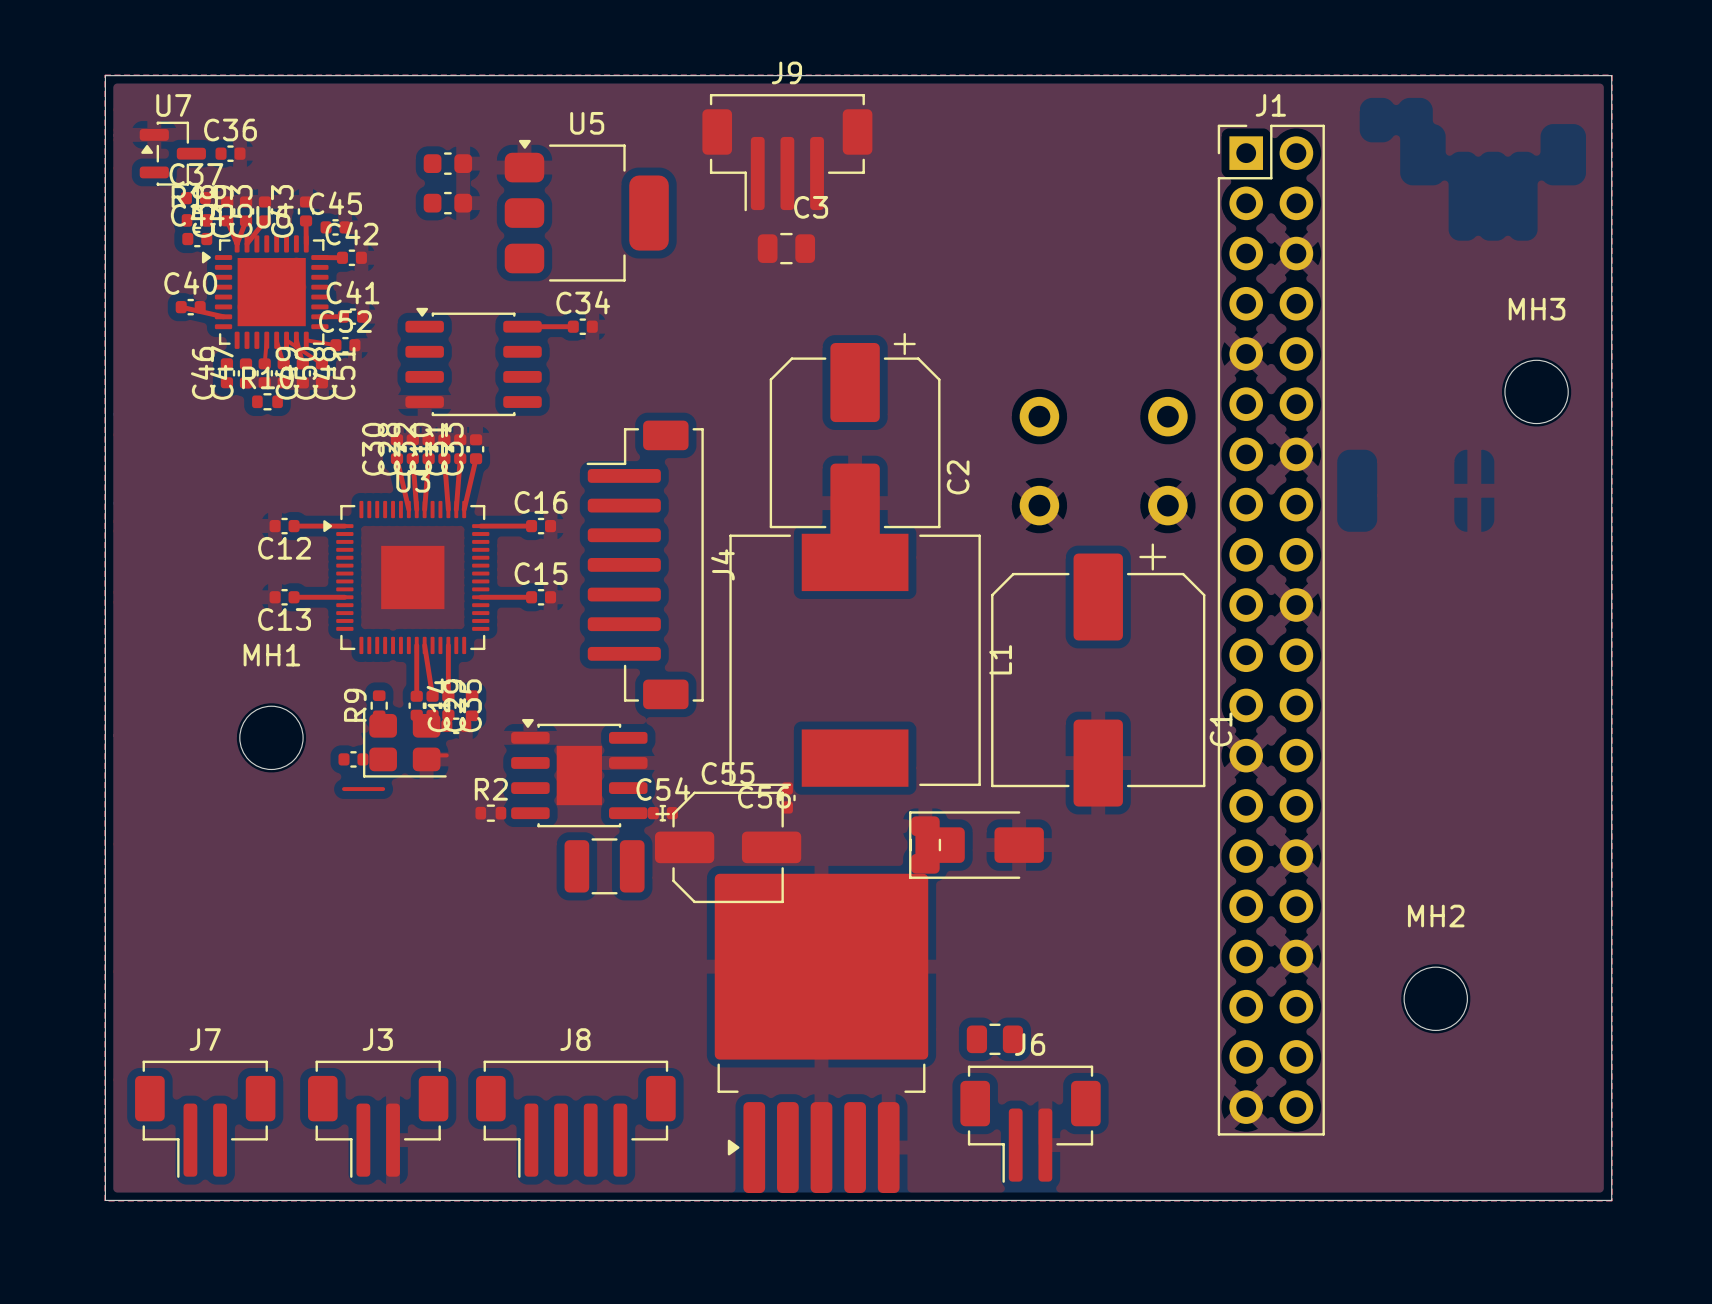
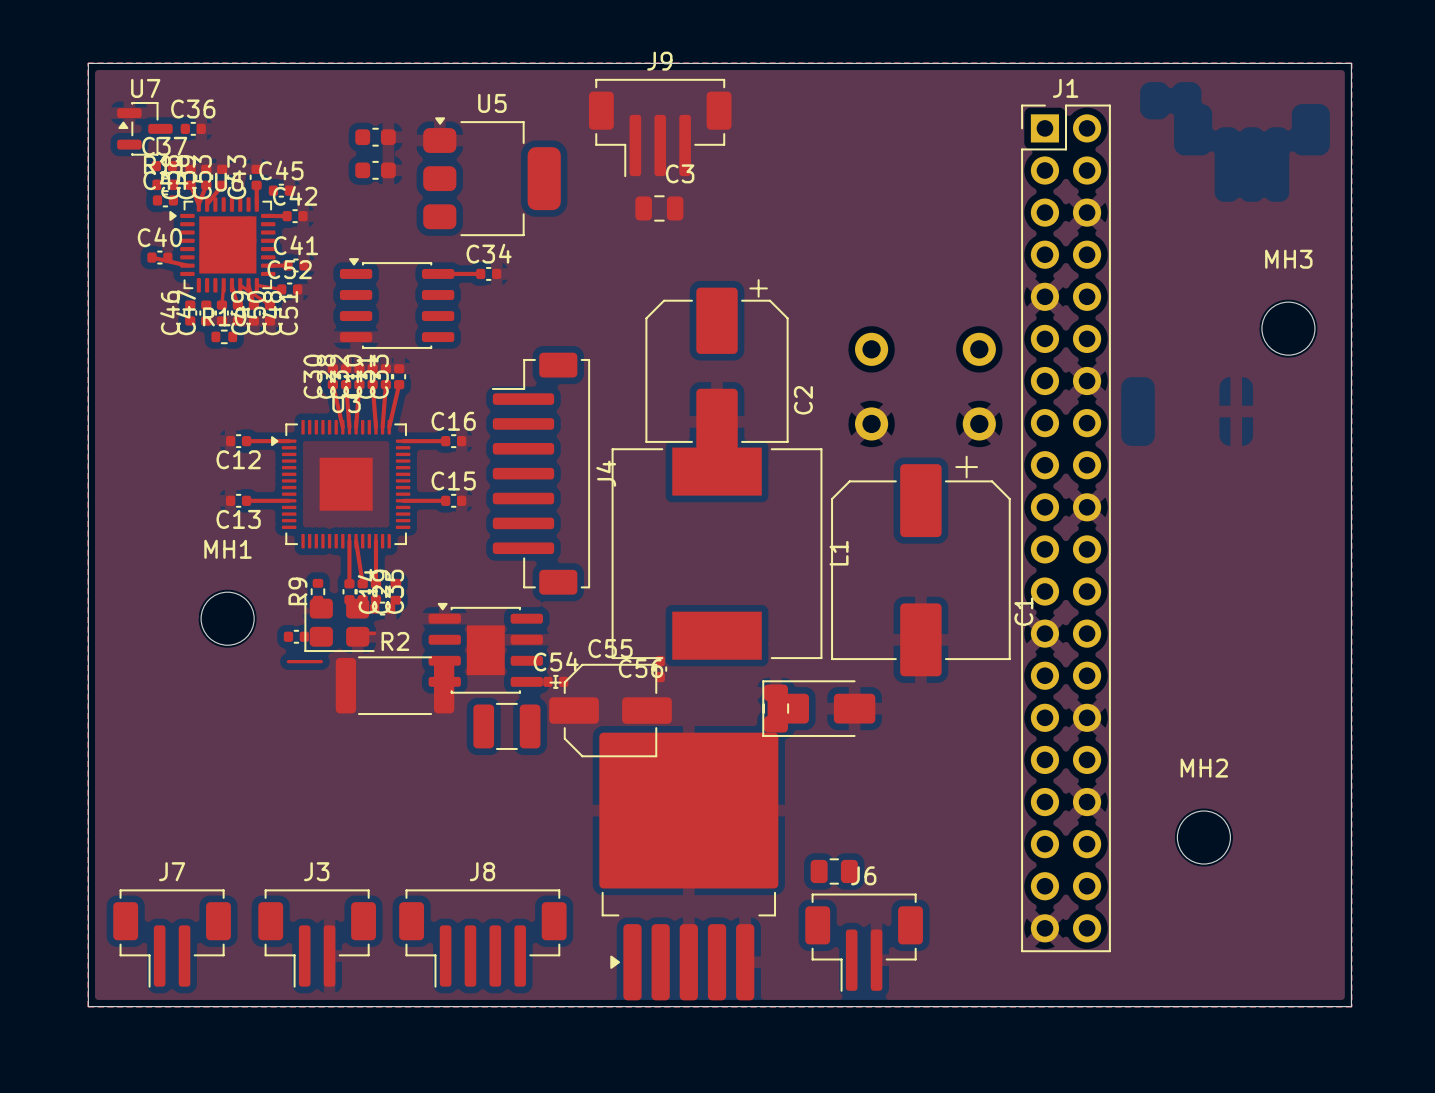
R2 footprint: [475, 804, 507, 822] -> [335, 656, 455, 716]

